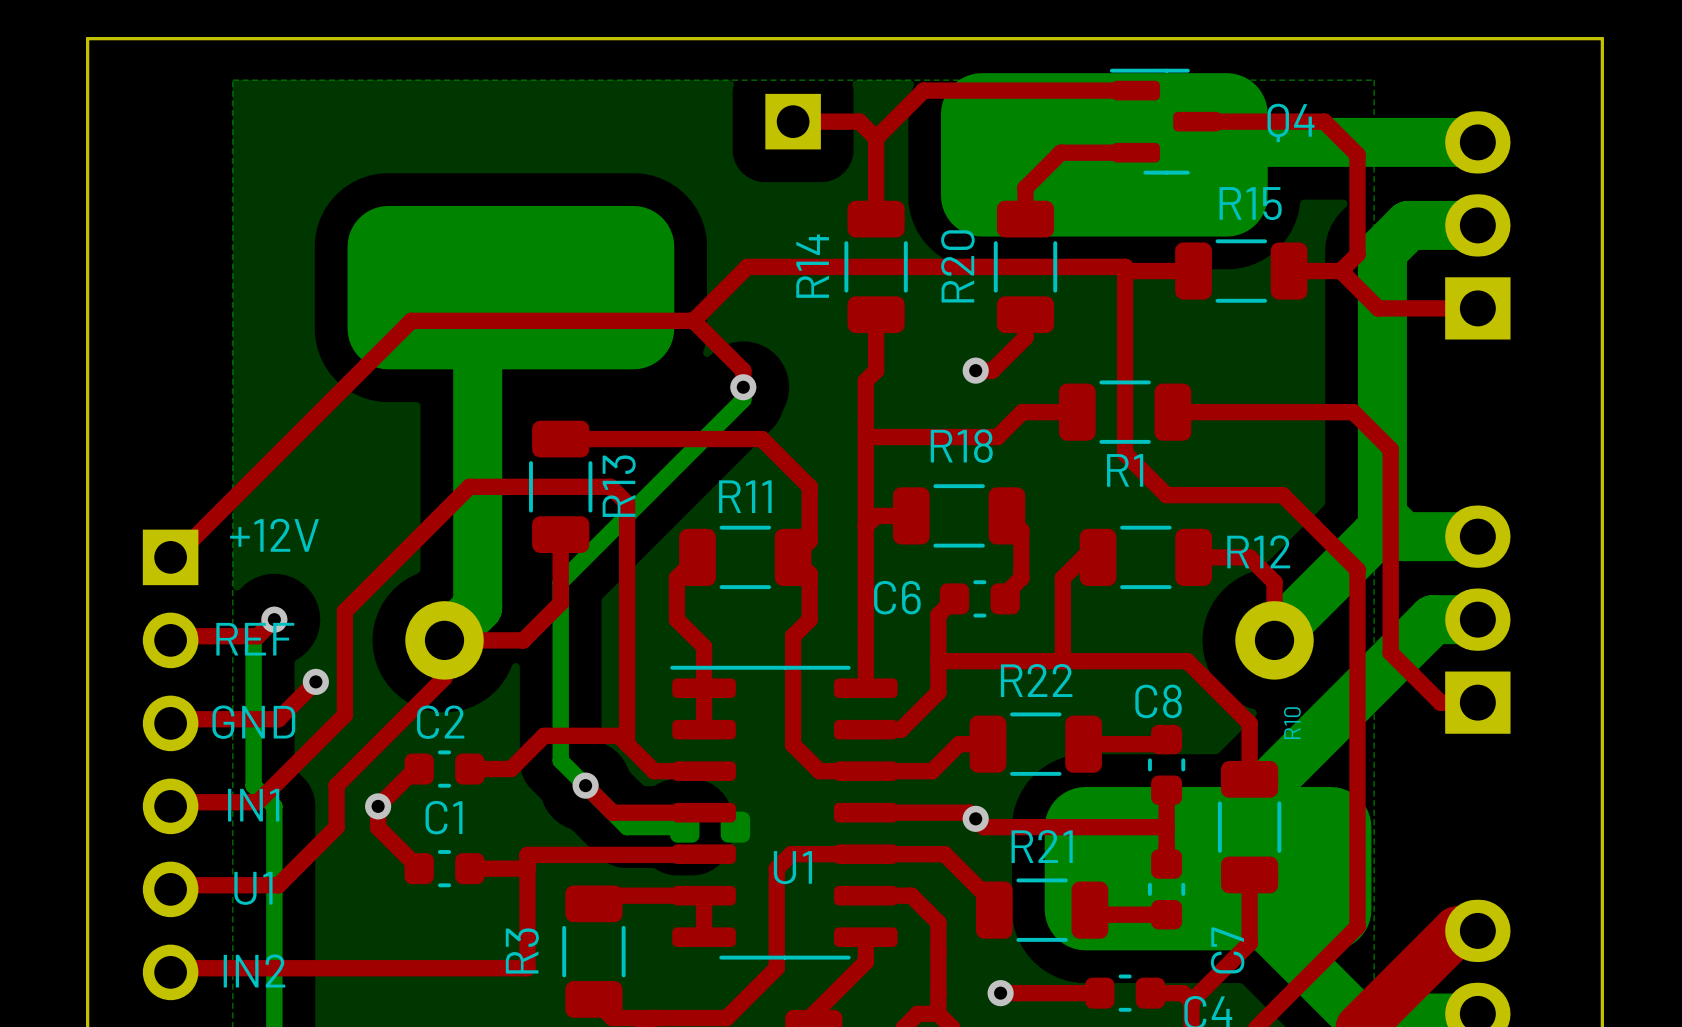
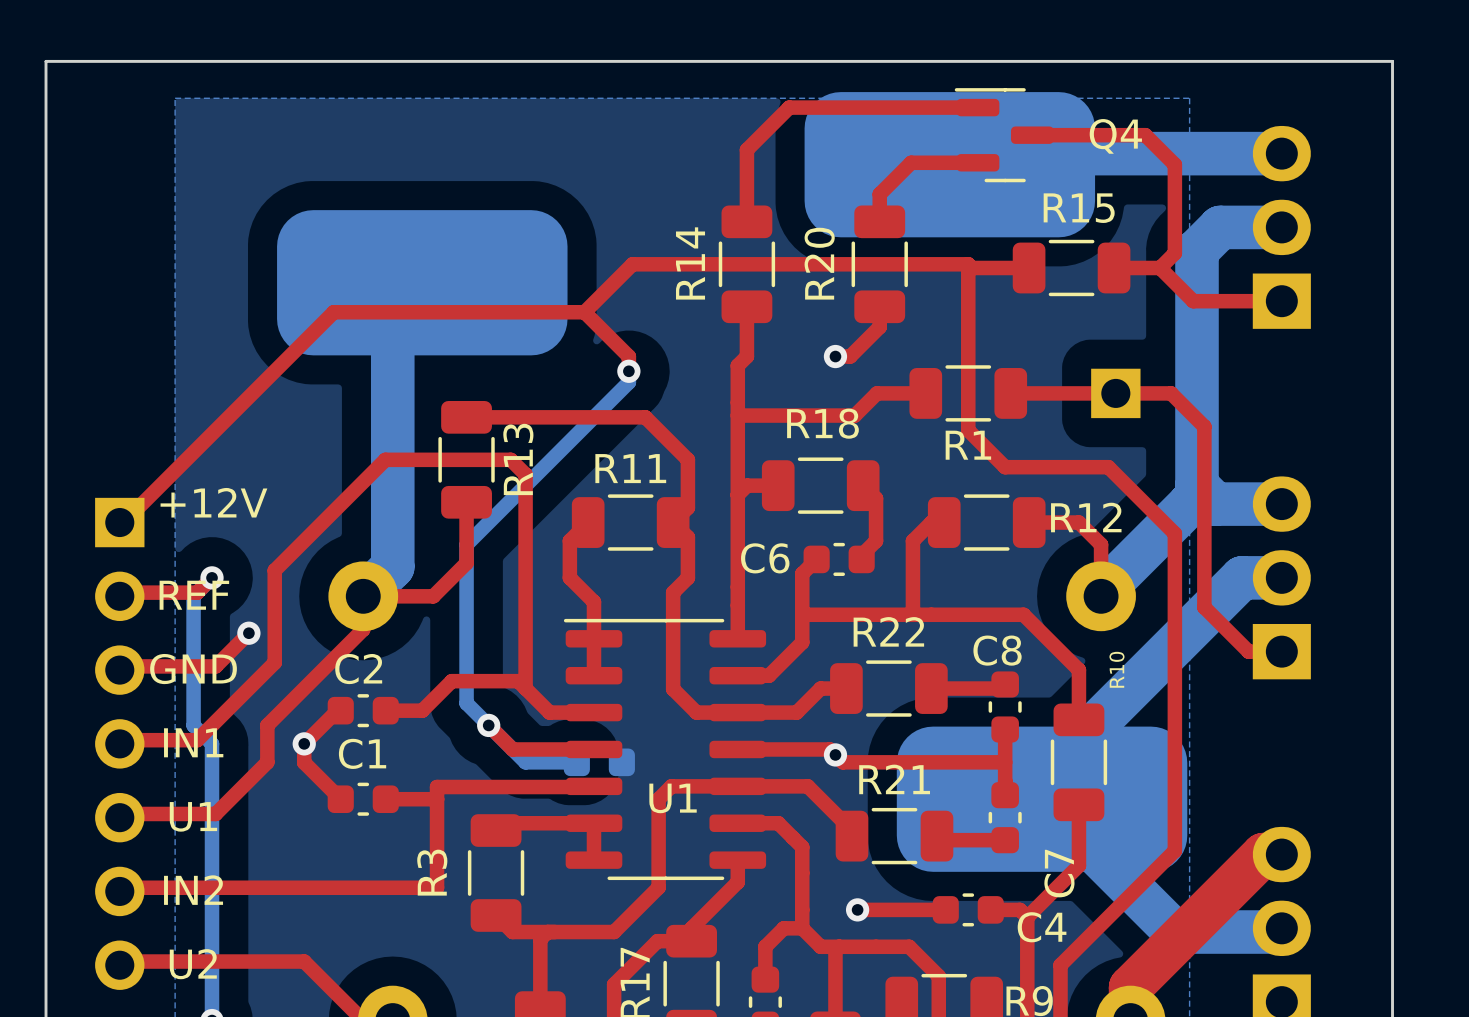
top track: (793, 121) (859, 121) (876, 138) -> none
part position: (793, 121) -> (1115, 393)

